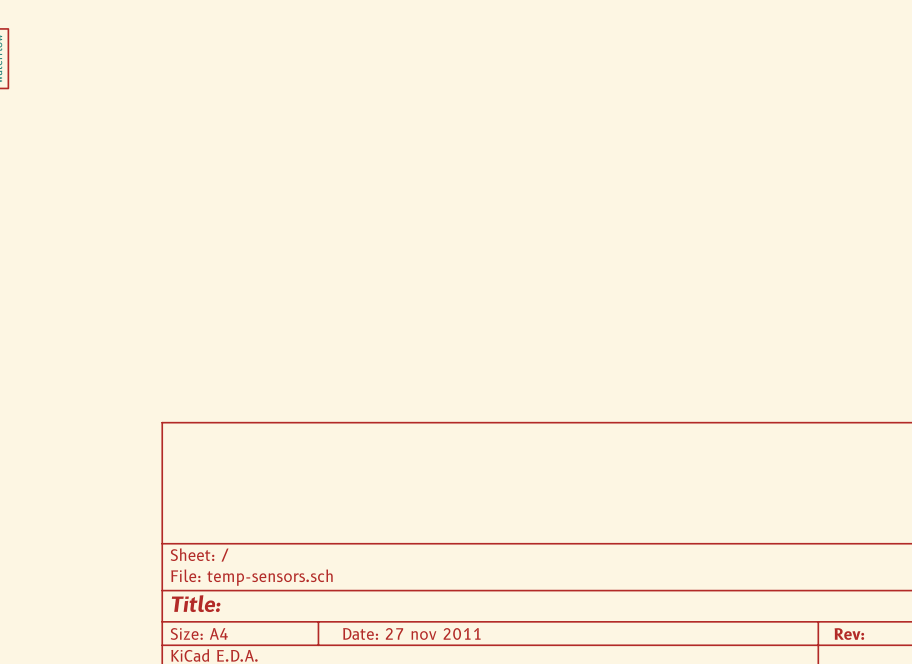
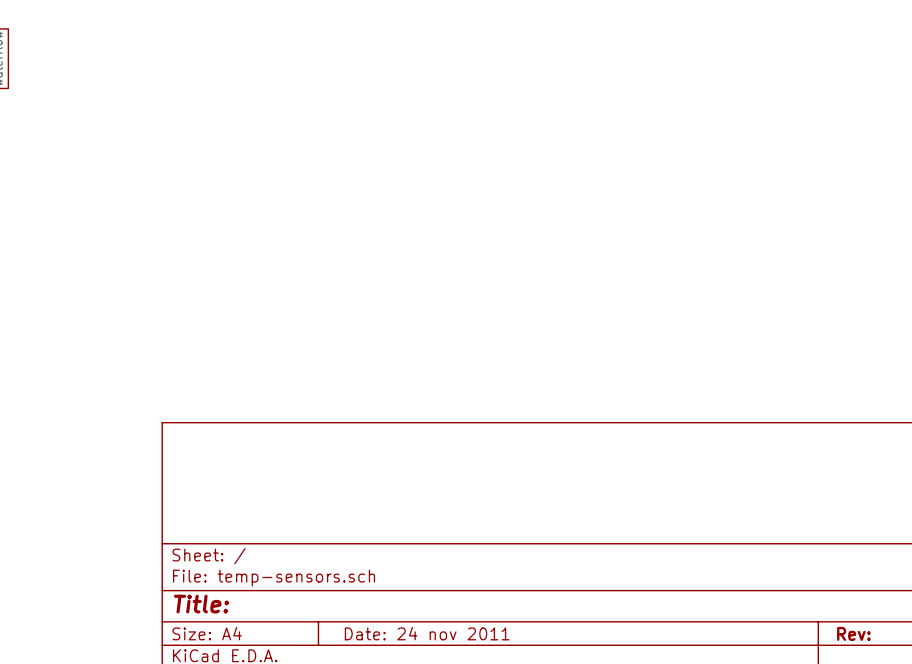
title block: Date: 27 nov 2011 (411, 633) -> Date: 24 nov 2011 (427, 633)

